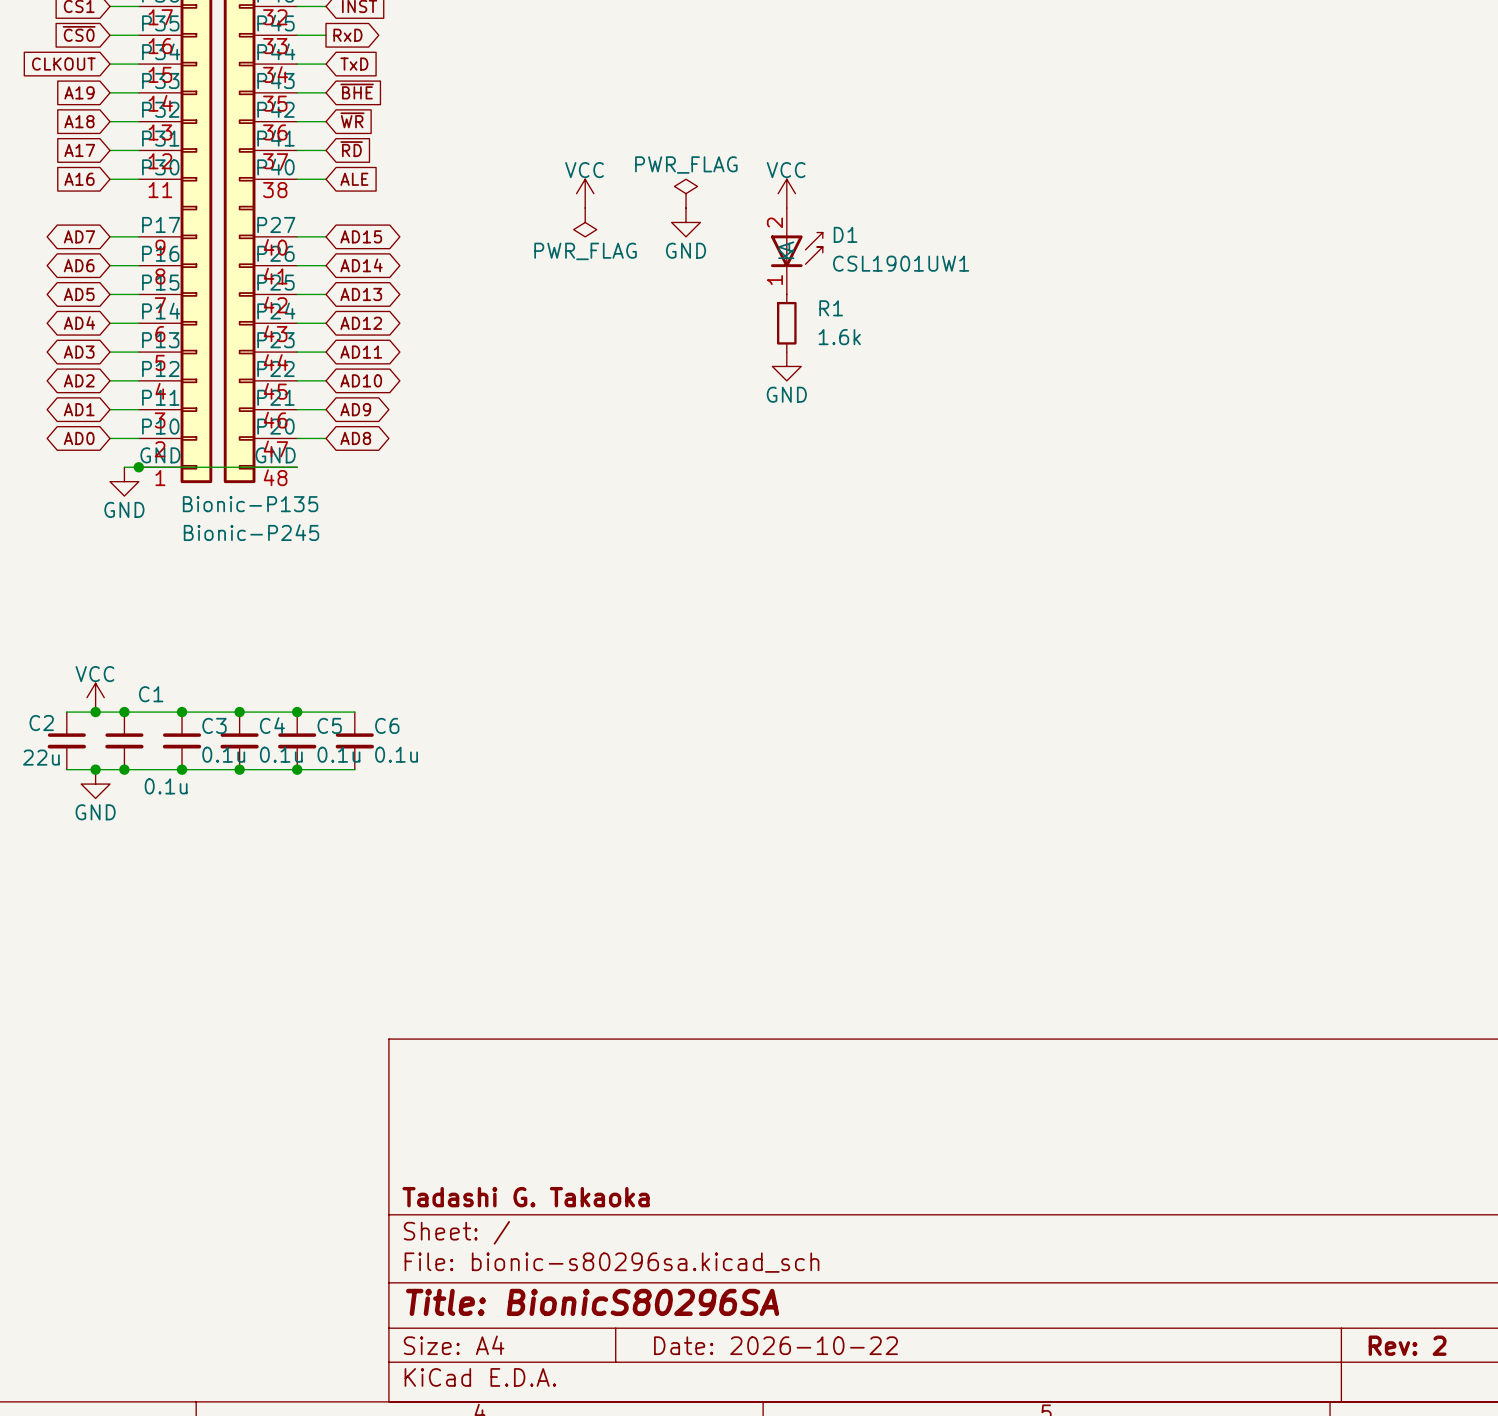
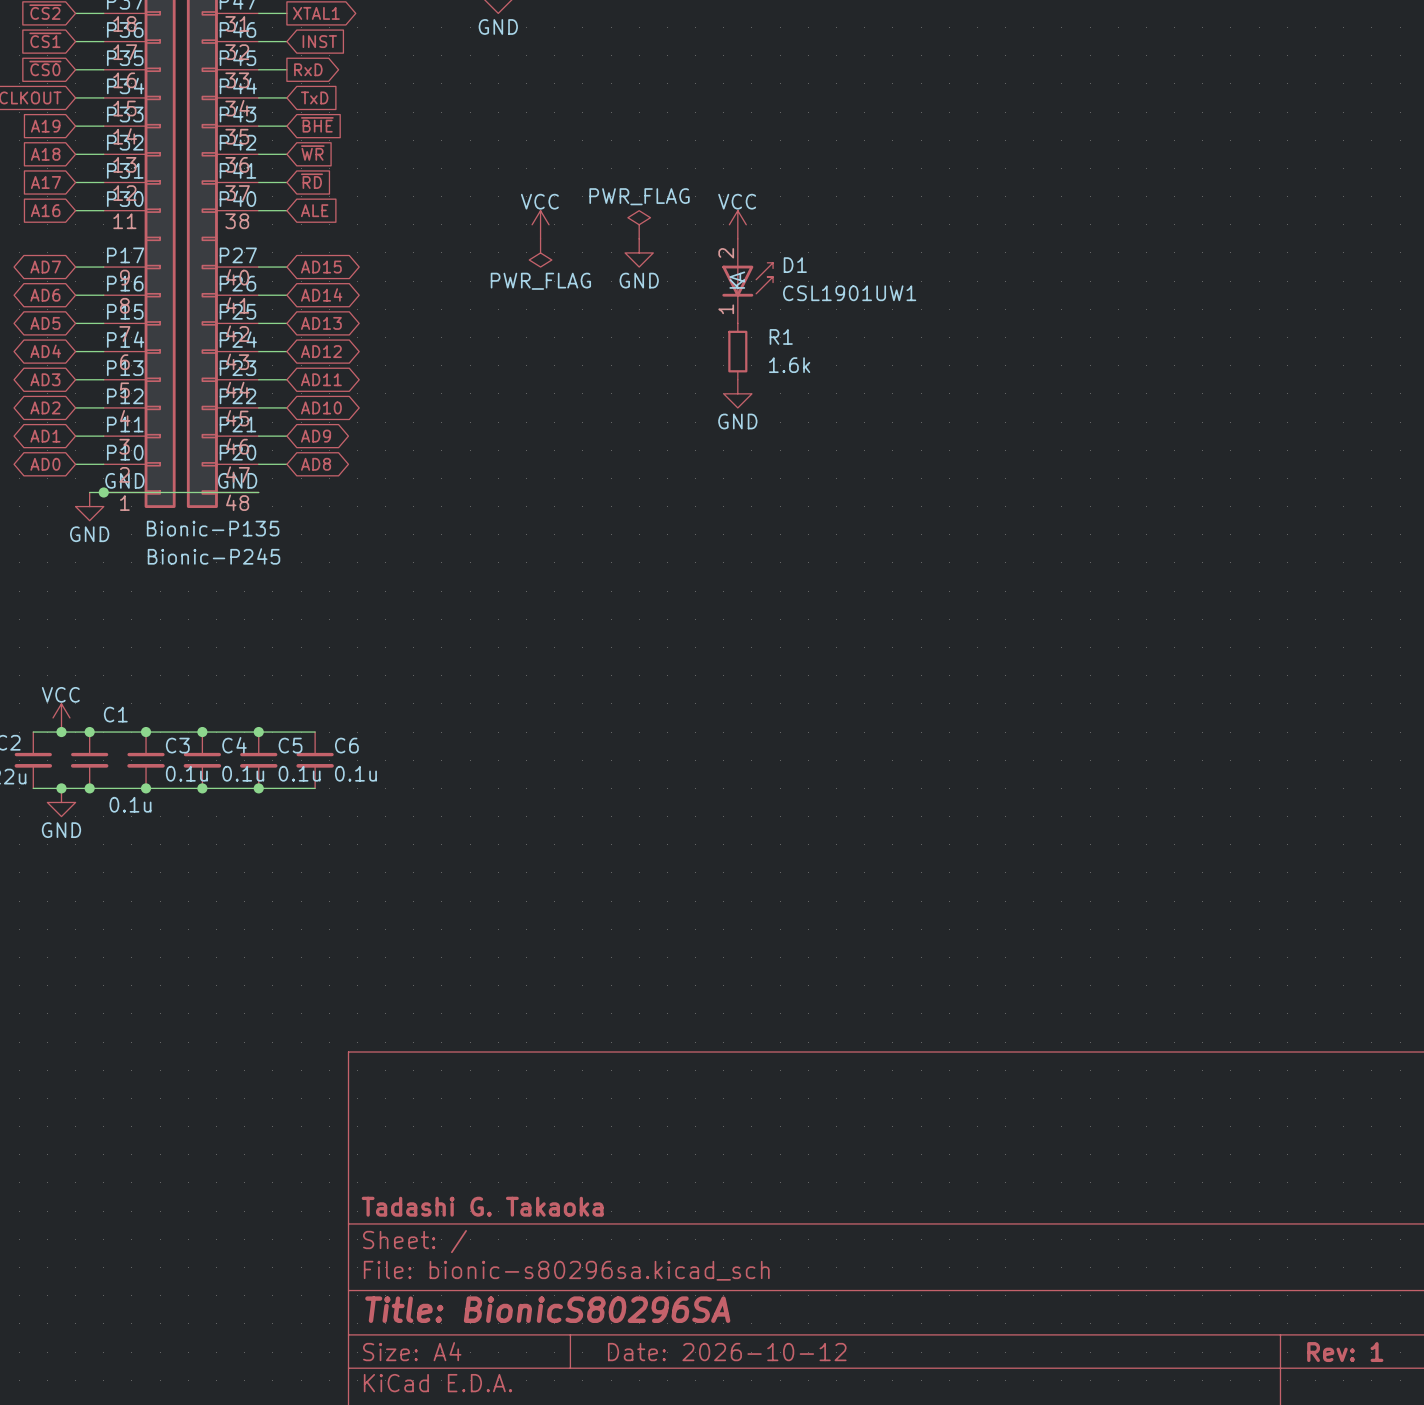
title block: Date: 2026-10-22 (775, 1345) -> Date: 2026-10-12 (727, 1352)
title block: Rev: 2 (1407, 1345) -> Rev: 1 (1345, 1352)

